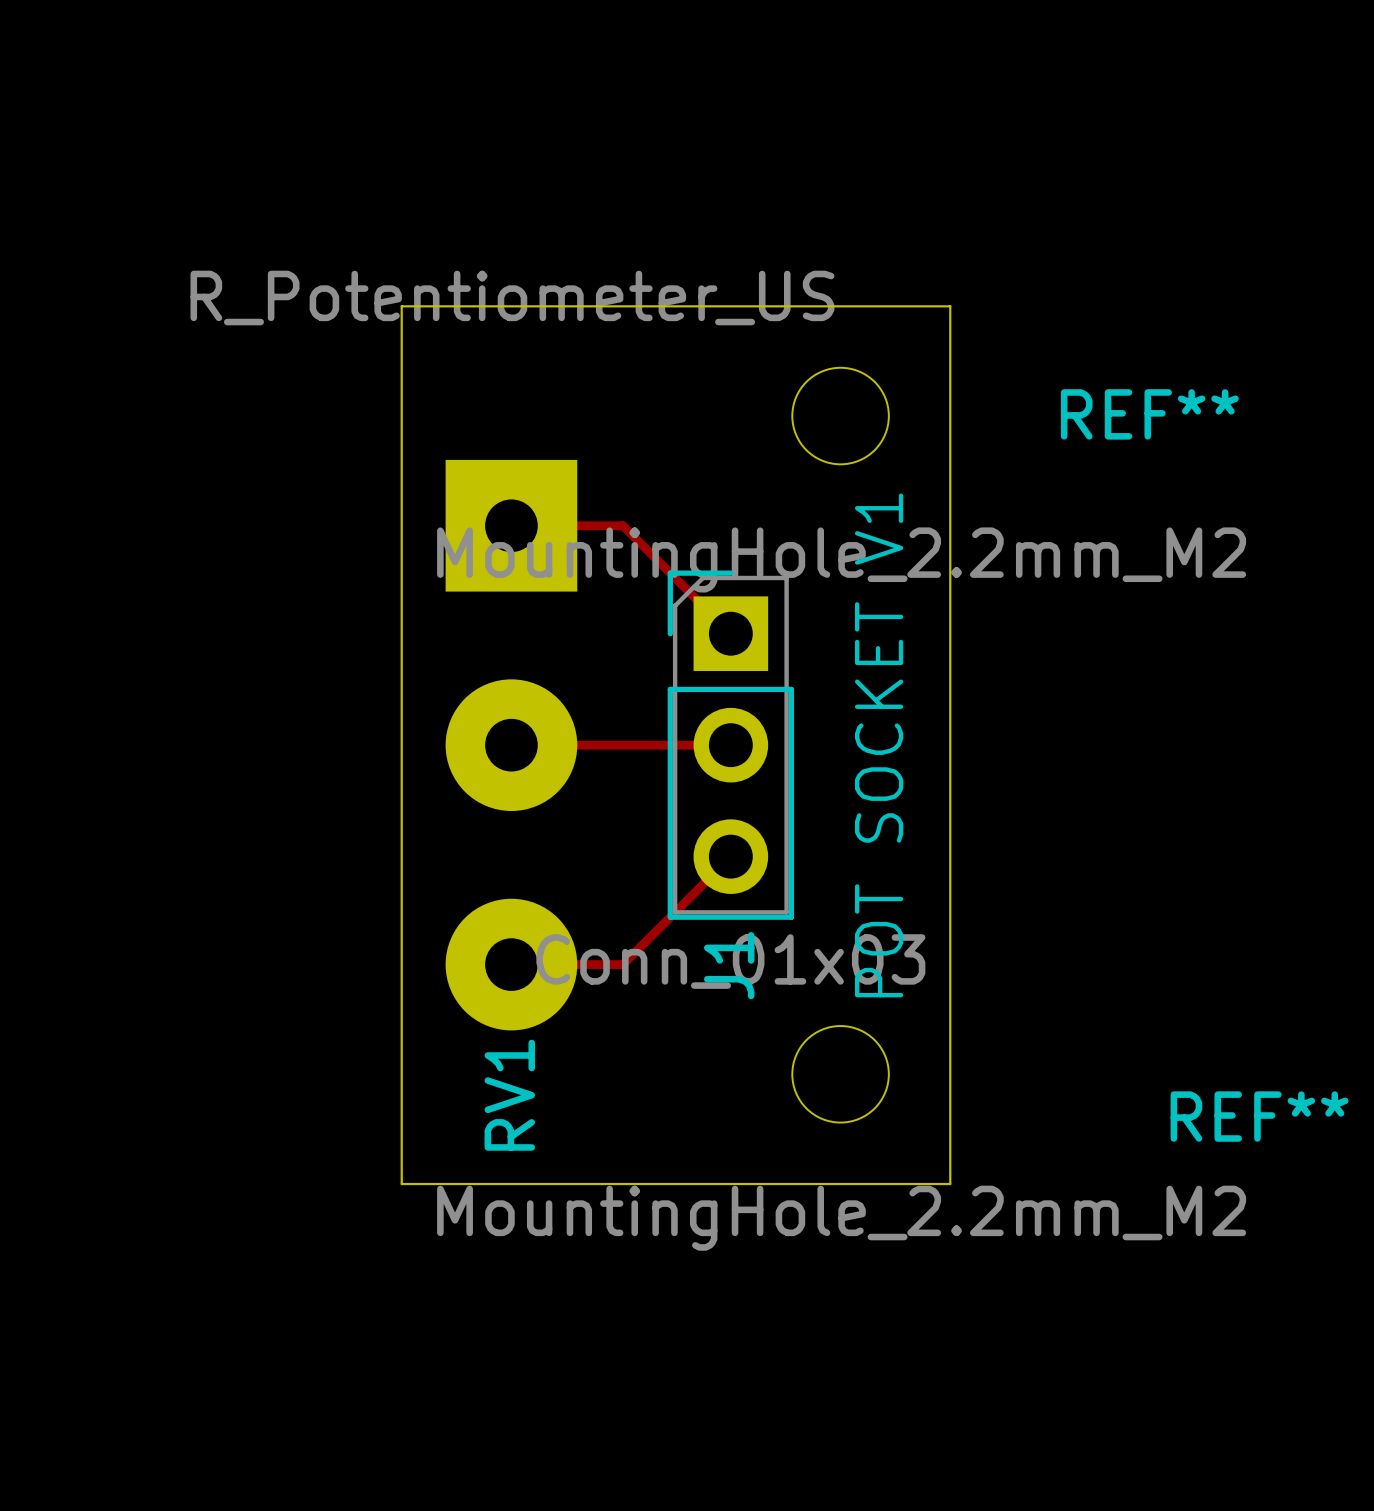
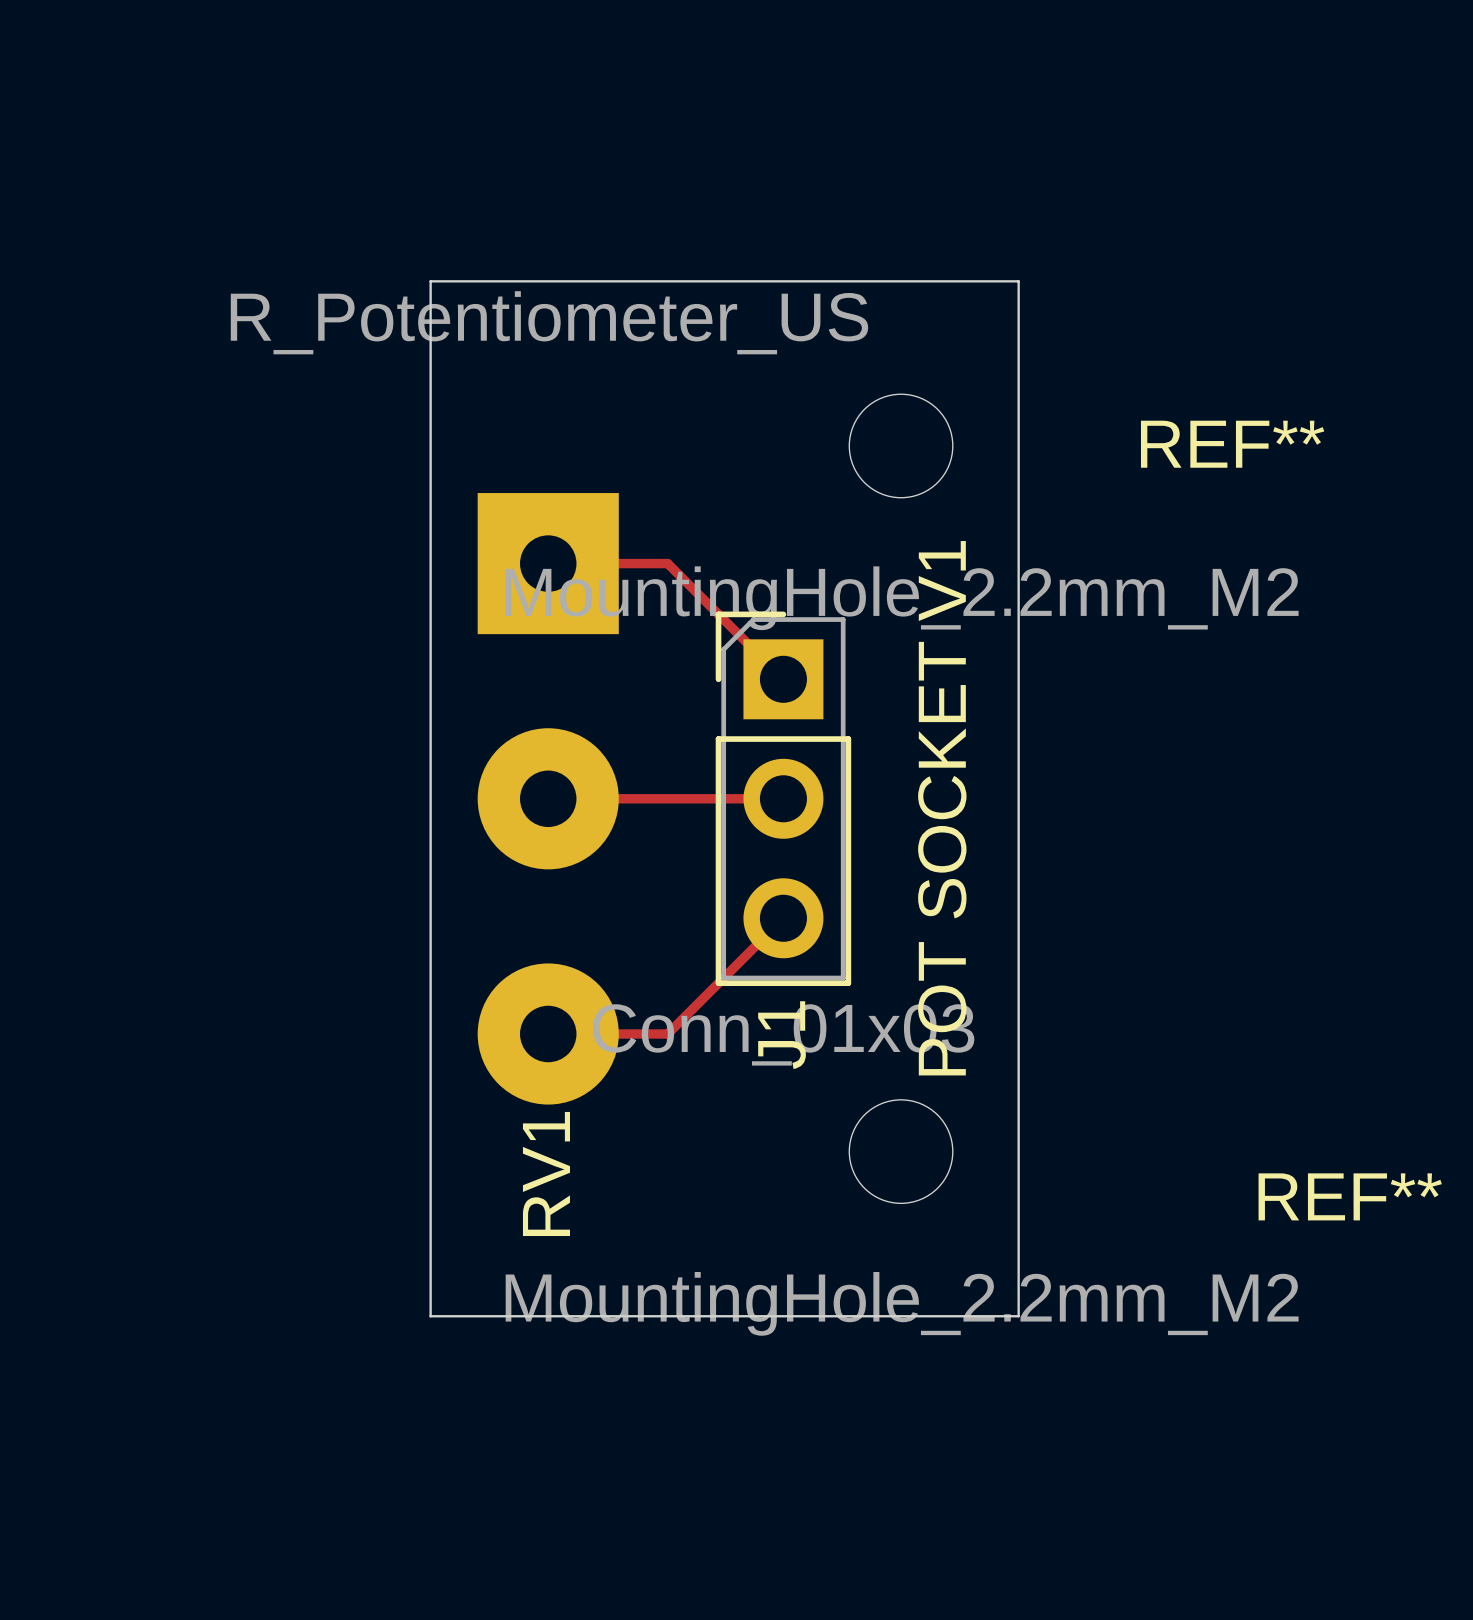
board edge: (401, 306) (950, 306) -> (430, 328) (430, 281) (1018, 281) (1018, 328)
board edge: (401, 1184) (950, 1184) -> (430, 1269) (430, 1316) (1018, 1316) (1018, 1269)

